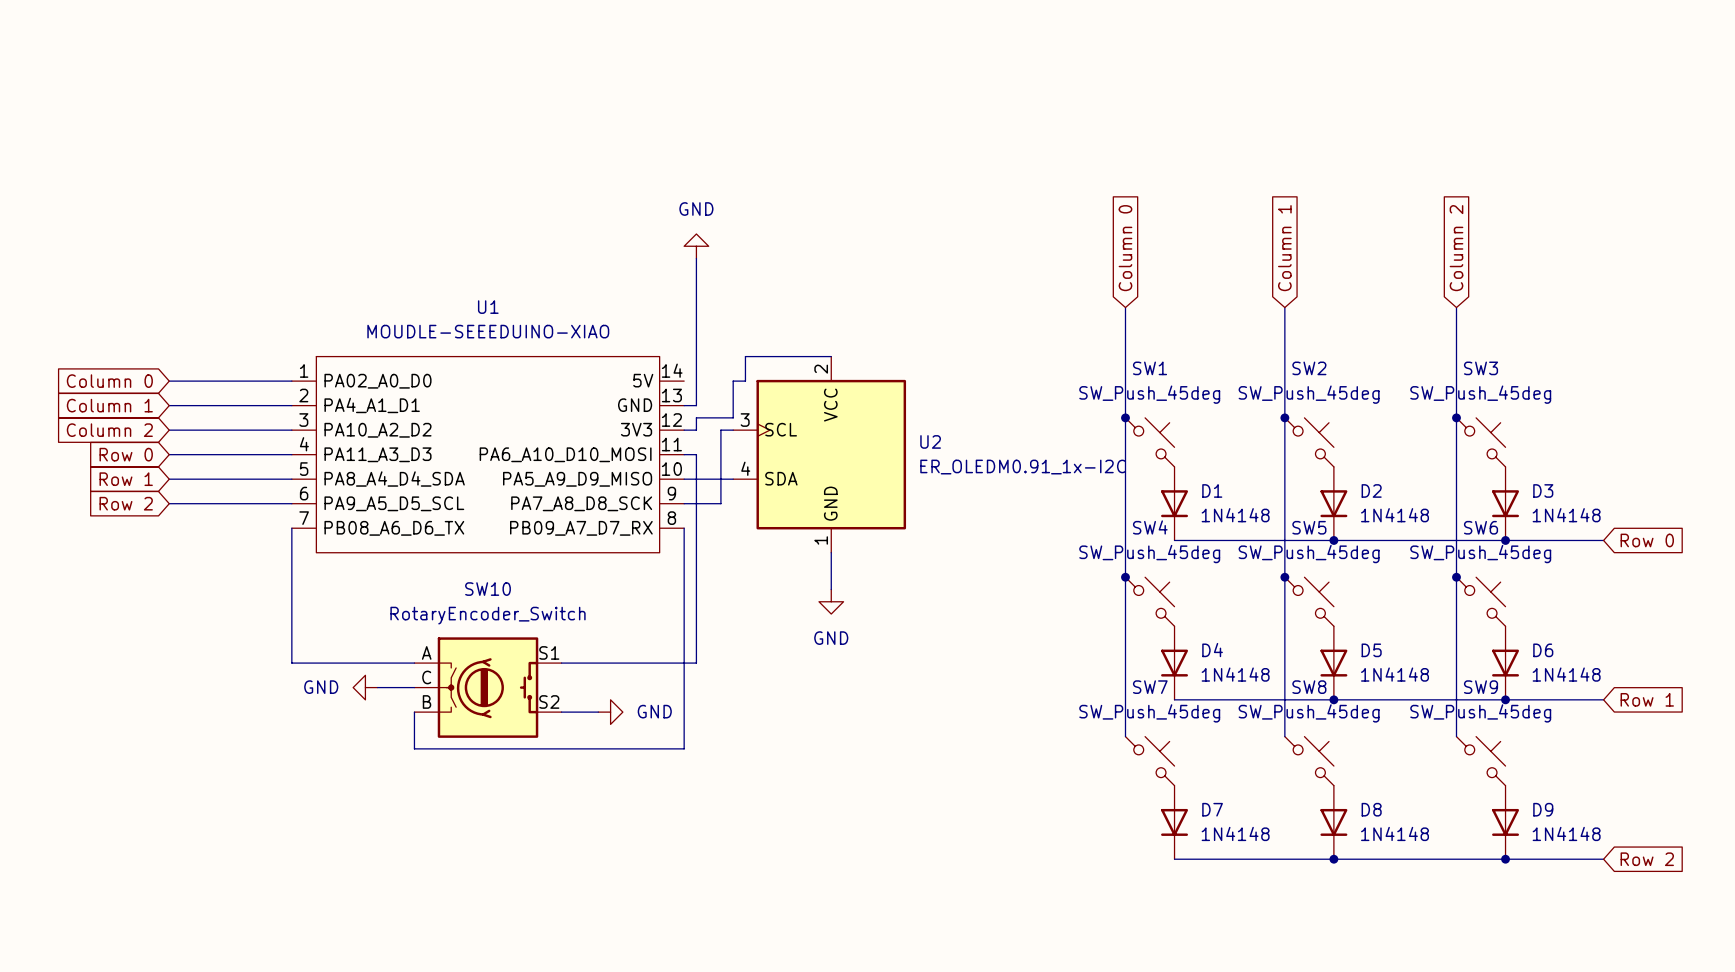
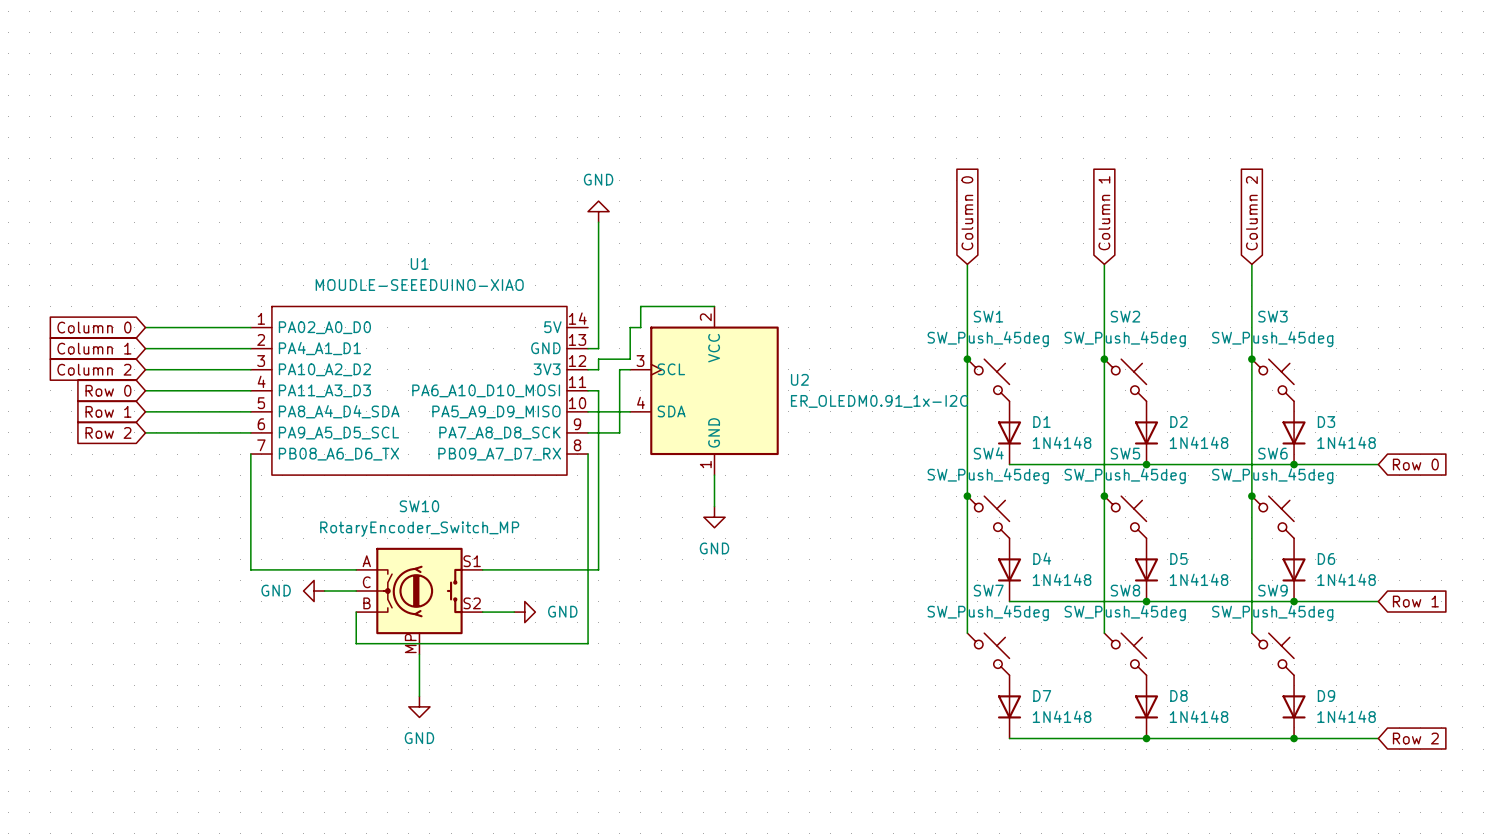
SW10 value: RotaryEncoder_Switch (488, 615) -> RotaryEncoder_Switch_MP (419, 529)
SW10 symbol: [414, 637, 562, 738] -> [356, 547, 483, 655]
wire: none -> (419, 654) (419, 696)
power symbol: none -> GND (419, 706)

